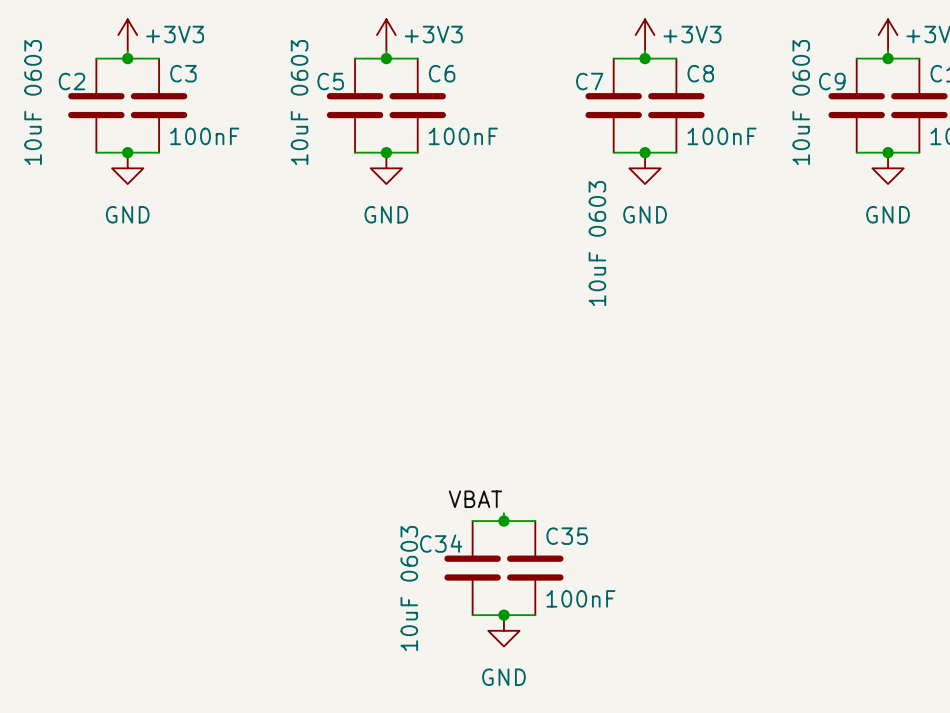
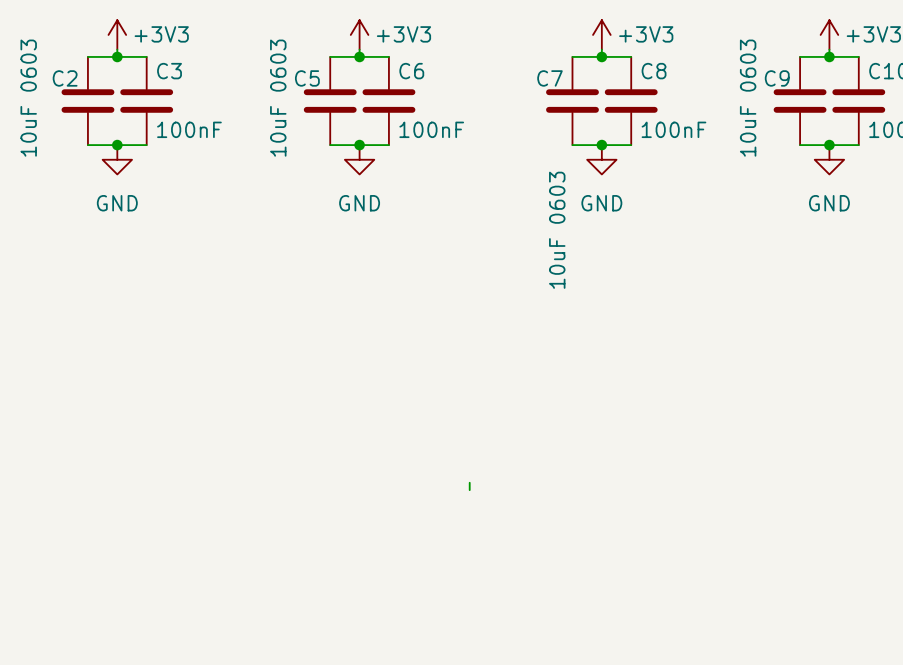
label: VBAT (475, 499) -> none
wire: (472, 521) (535, 521) -> none
junction: (503, 521) -> none
C34: 10uF 0603 (472, 568) -> none
C35: 100nF (535, 568) -> none
wire: (472, 615) (535, 615) -> none
junction: (503, 615) -> none
power symbol: GND (503, 630) -> none

